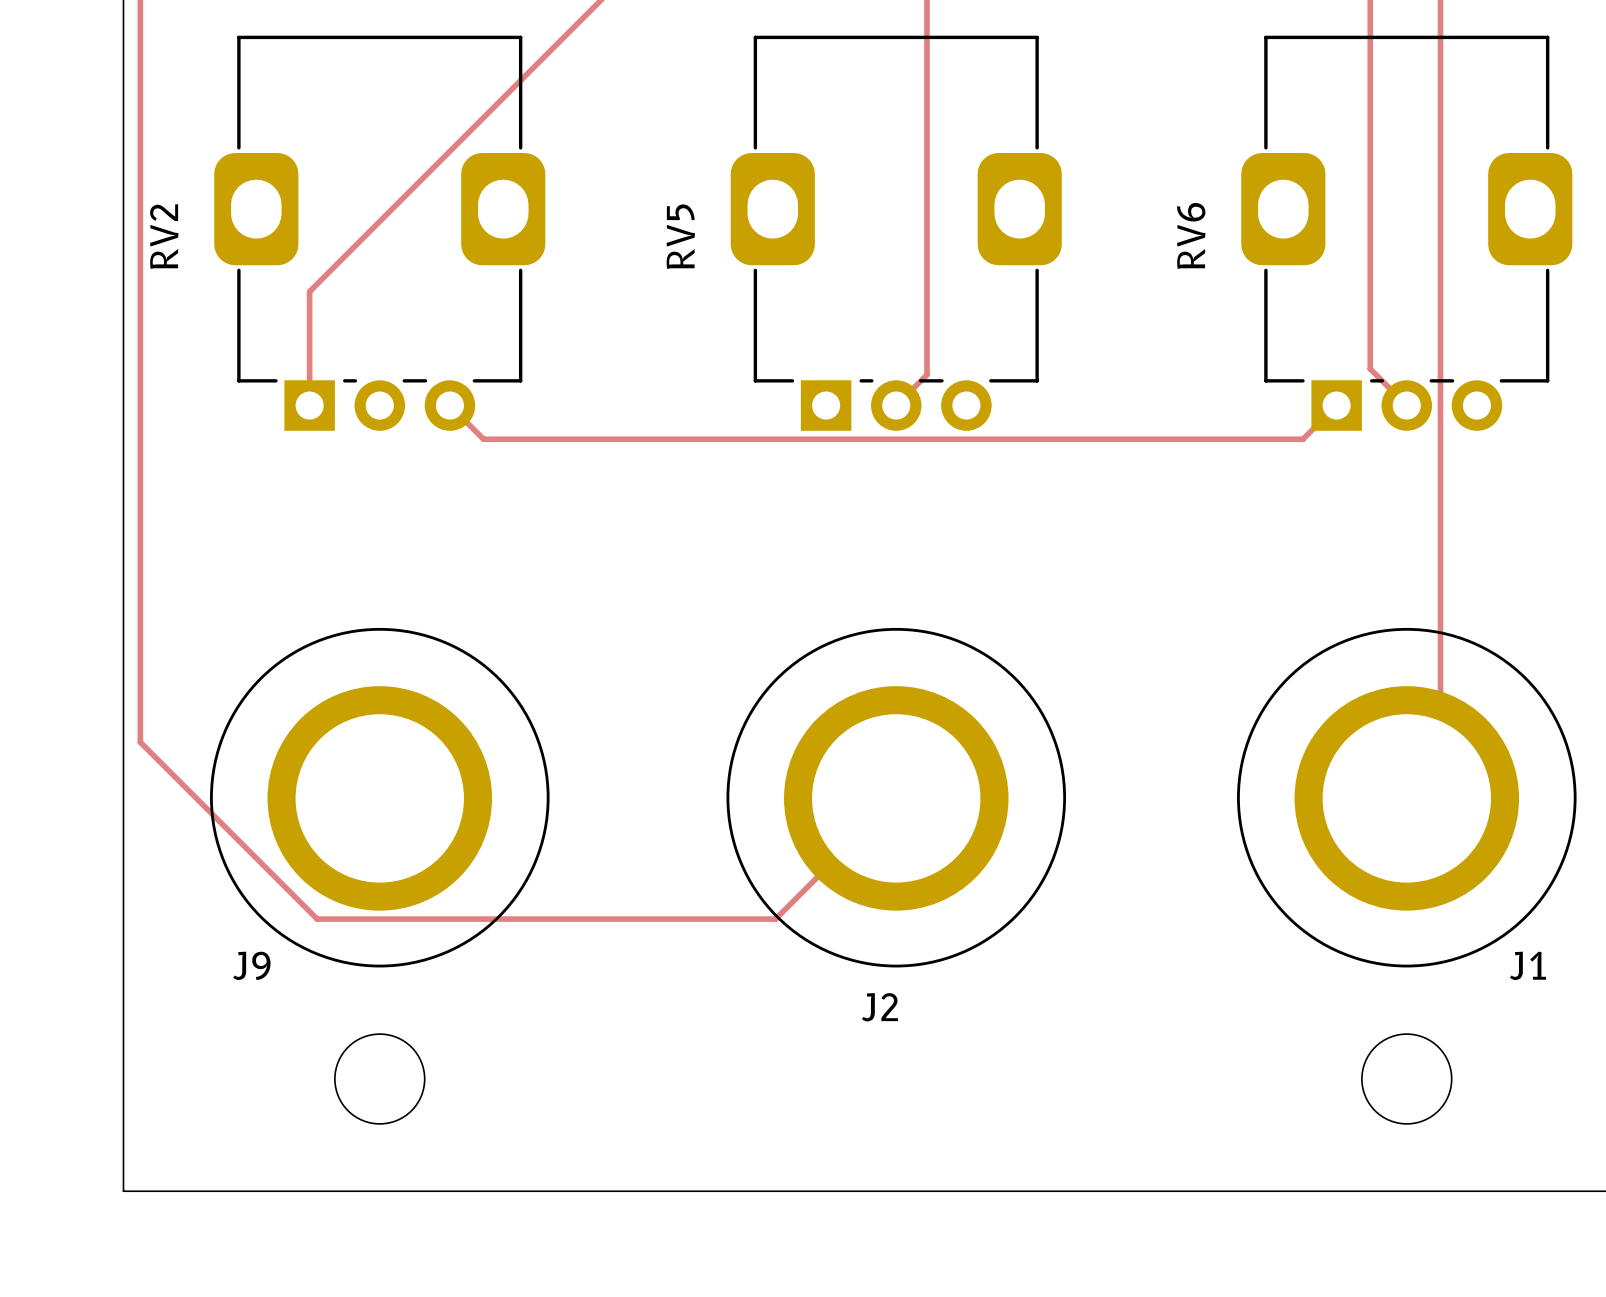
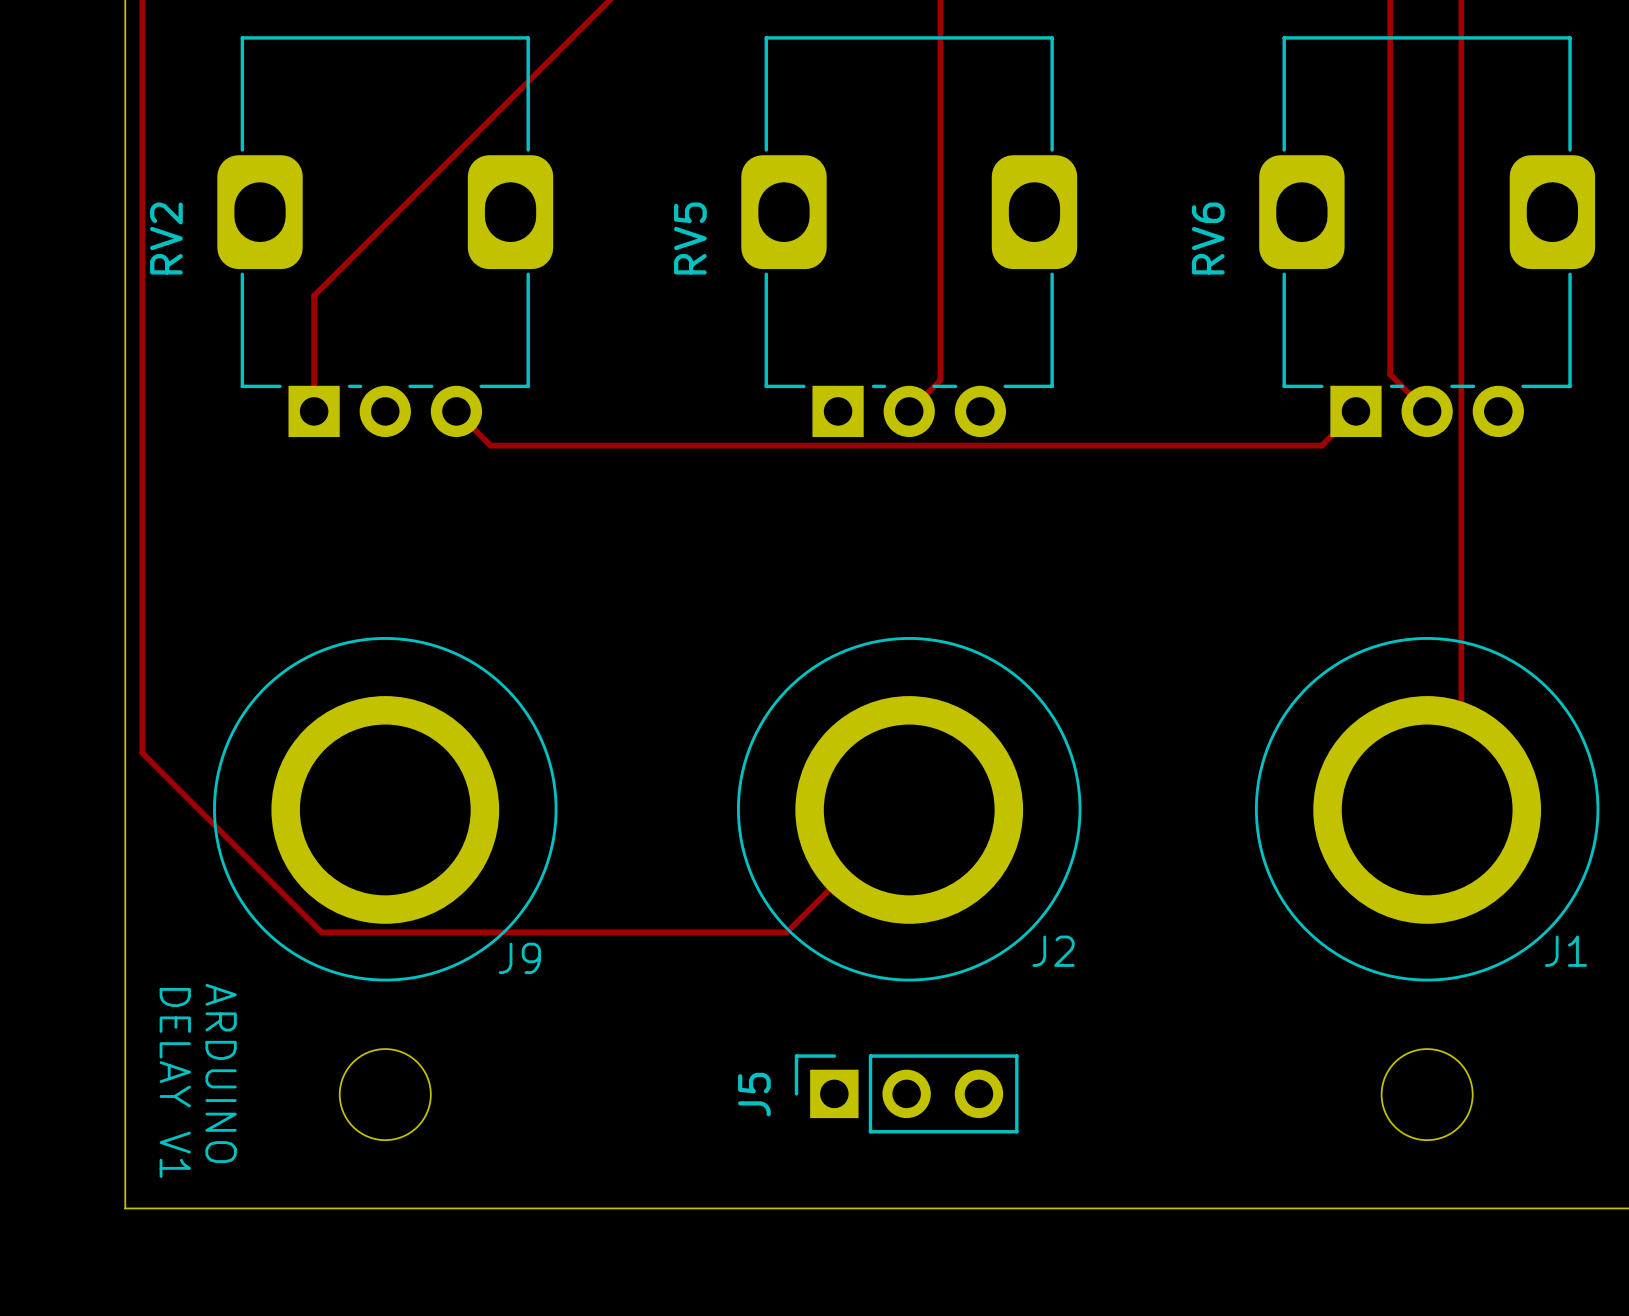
J9 name position: J9 (251, 965) -> J9 (519, 958)
J1 name position: J1 (1527, 965) -> J1 (1565, 951)
J2 name position: J2 (879, 1007) -> J2 (1053, 951)
text: none -> ARDUINO (221, 1073)
text: none -> DELAY V1 (175, 1082)
J5: none -> (906, 1093)

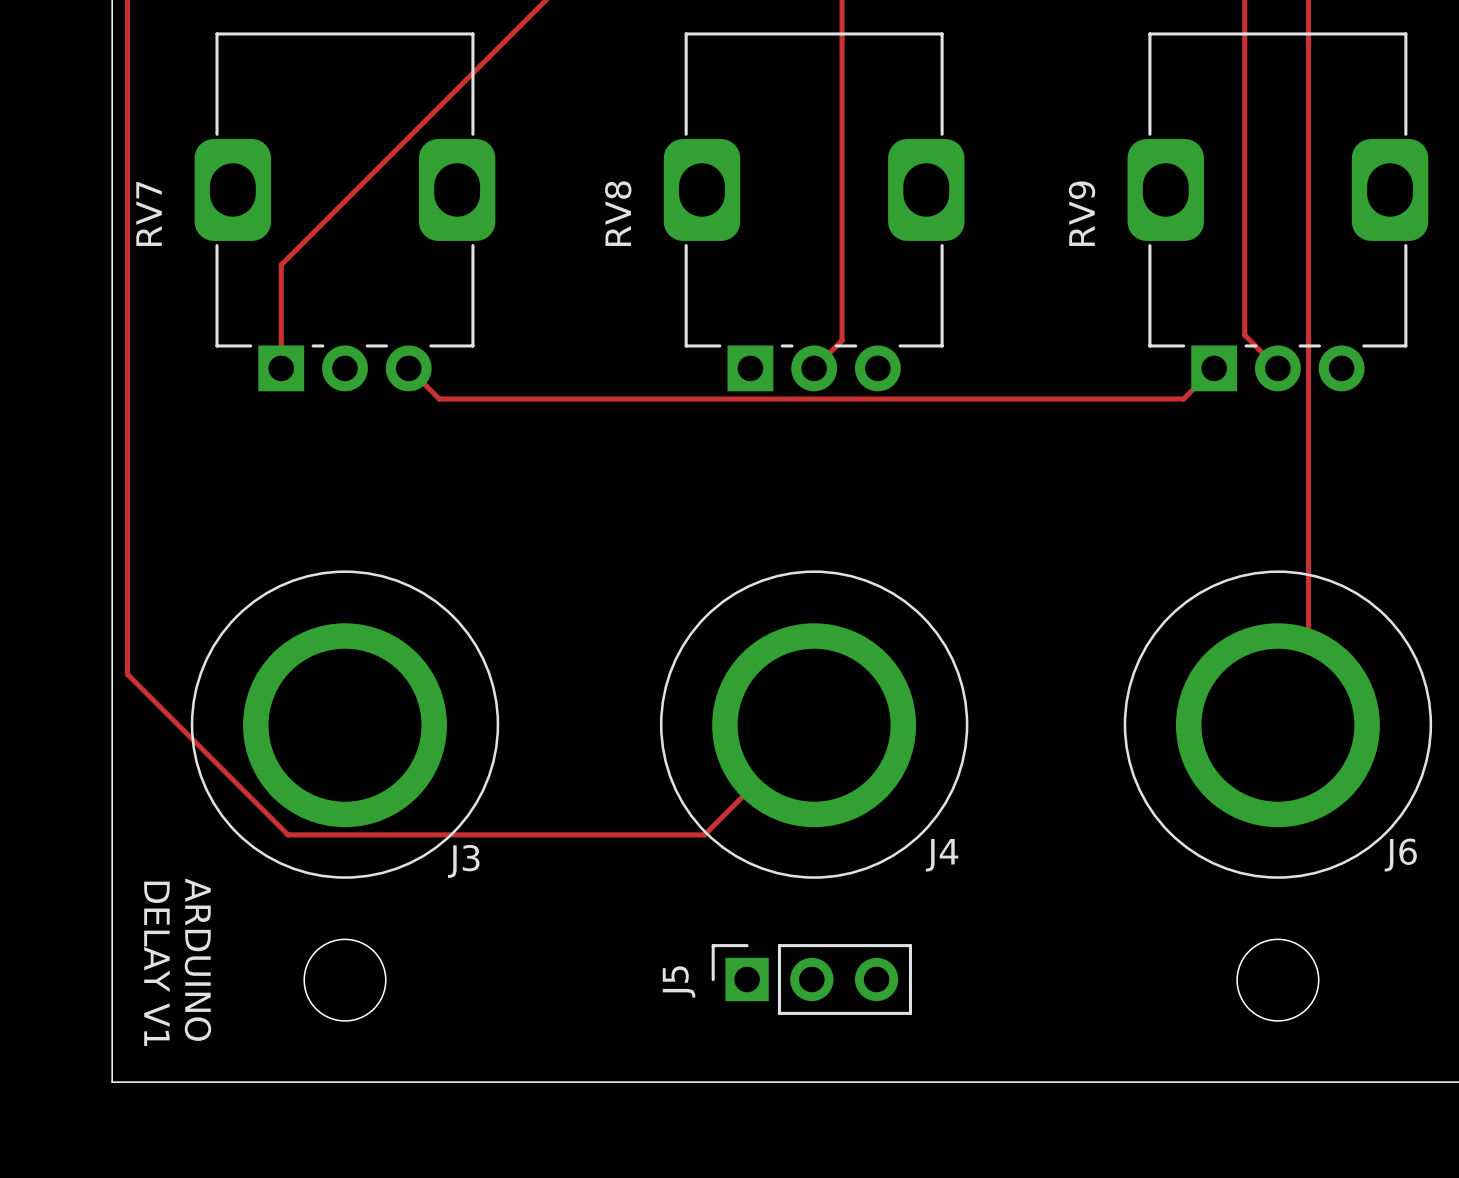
RV2 name: RV2 (166, 238) -> RV7 (149, 213)
RV5 name: RV5 (690, 238) -> RV8 (618, 213)
RV6 name: RV6 (1208, 238) -> RV9 (1081, 213)
J2 name: J2 (1053, 951) -> J4 (942, 855)
J1 name: J1 (1565, 951) -> J6 (1400, 855)
J9 name: J9 (519, 958) -> J3 (463, 861)

